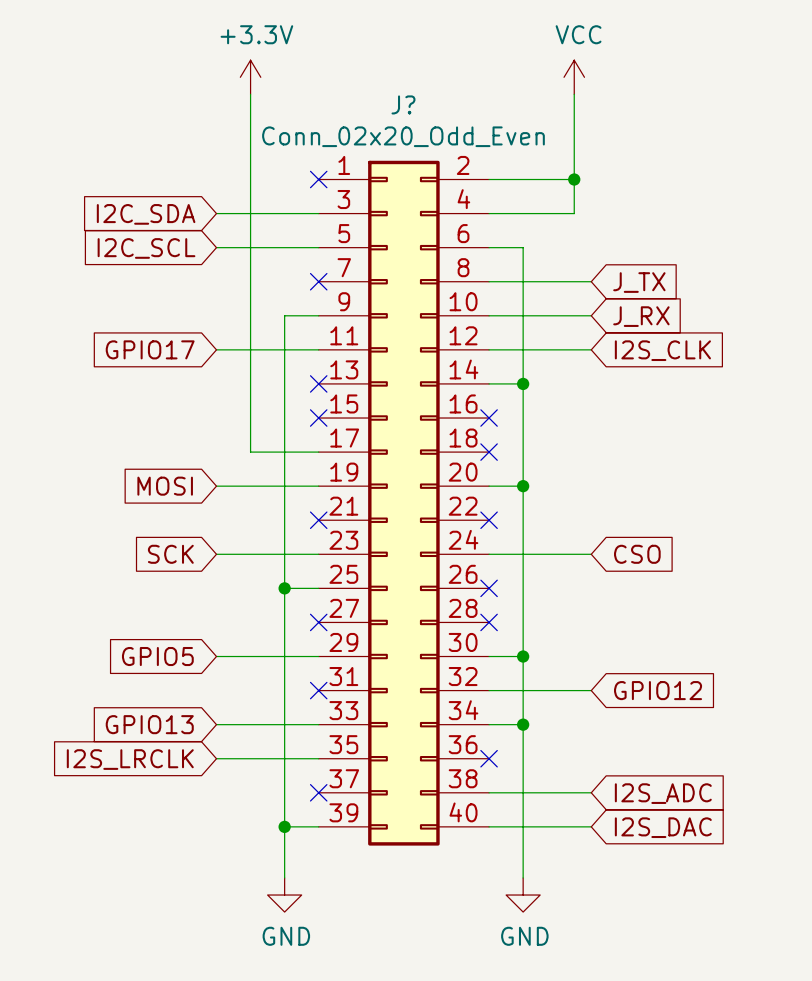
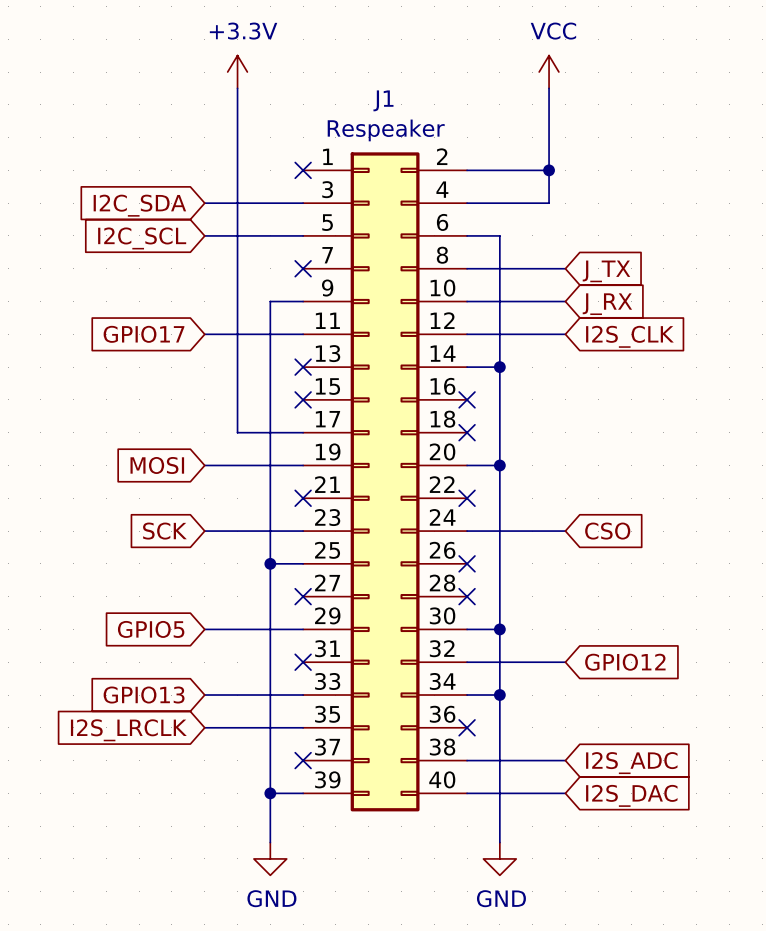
J? name: J? (403, 104) -> J1 (383, 100)
J? value: Conn_02x20_Odd_Even (403, 136) -> Respeaker (386, 130)

